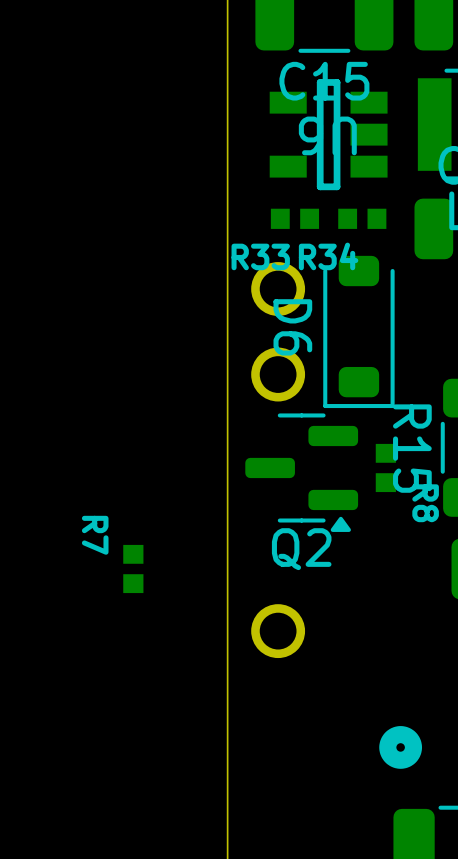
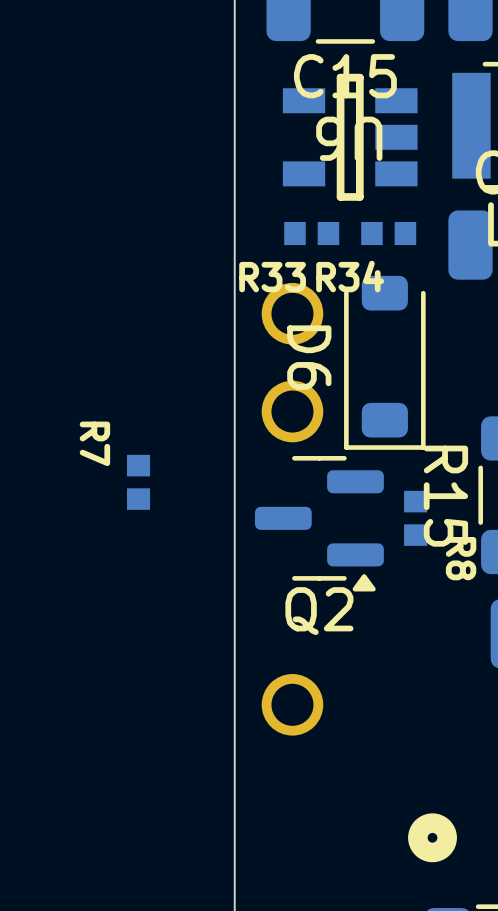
R7 position: (133, 568) -> (138, 482)

